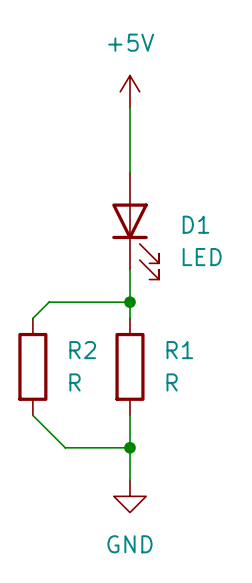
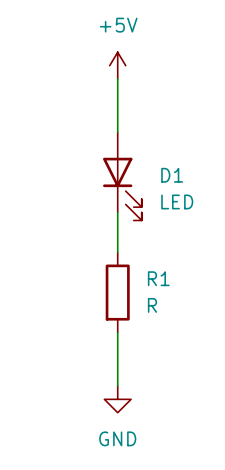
wire: (129, 302) (49, 302) (32, 318) -> none
junction: (129, 302) -> none
R2: R (32, 366) -> none
wire: (32, 415) (65, 447) (129, 447) -> none
junction: (129, 447) -> none

